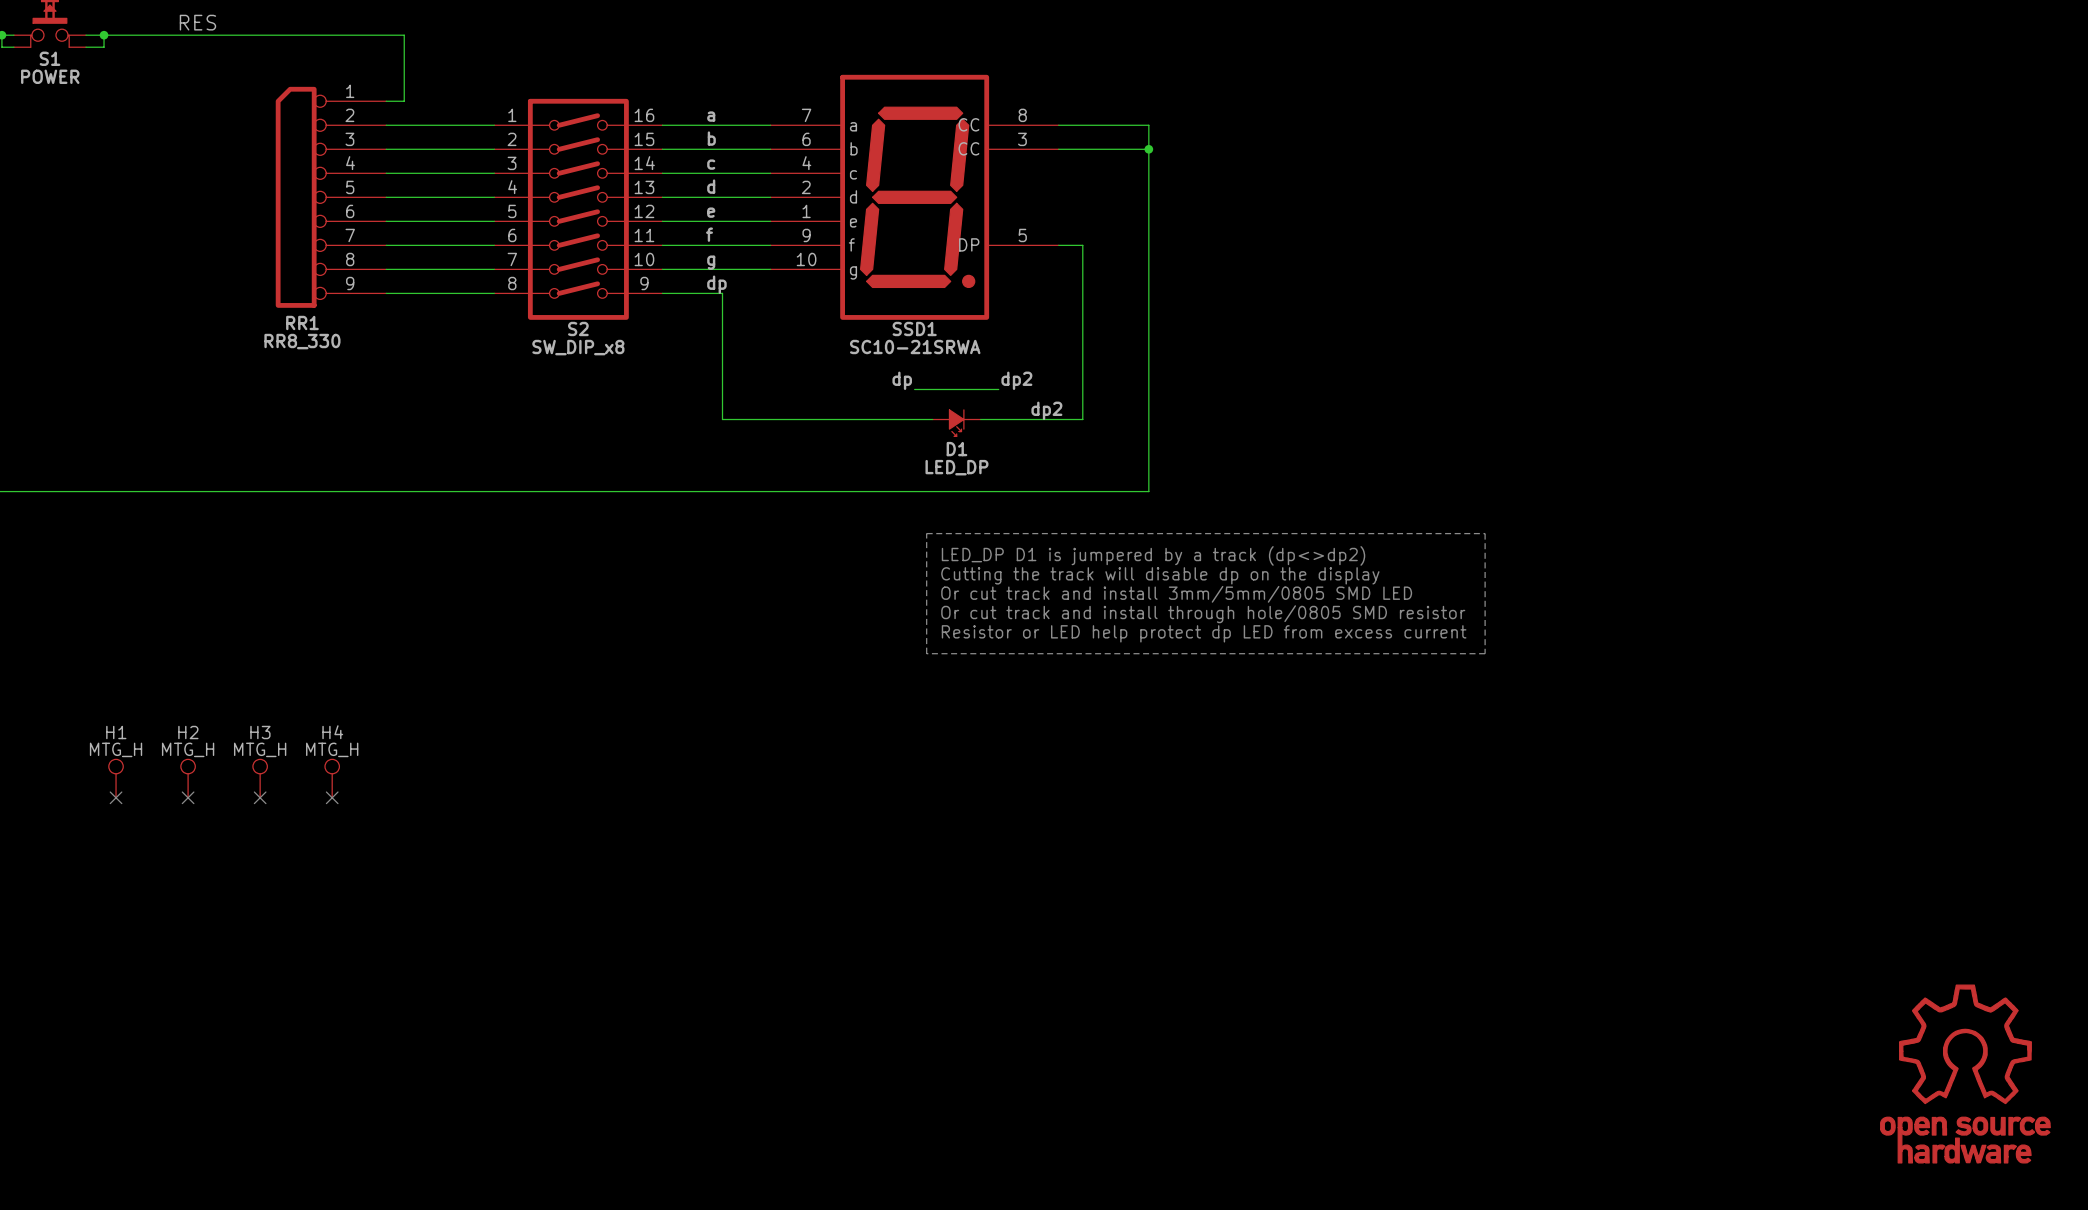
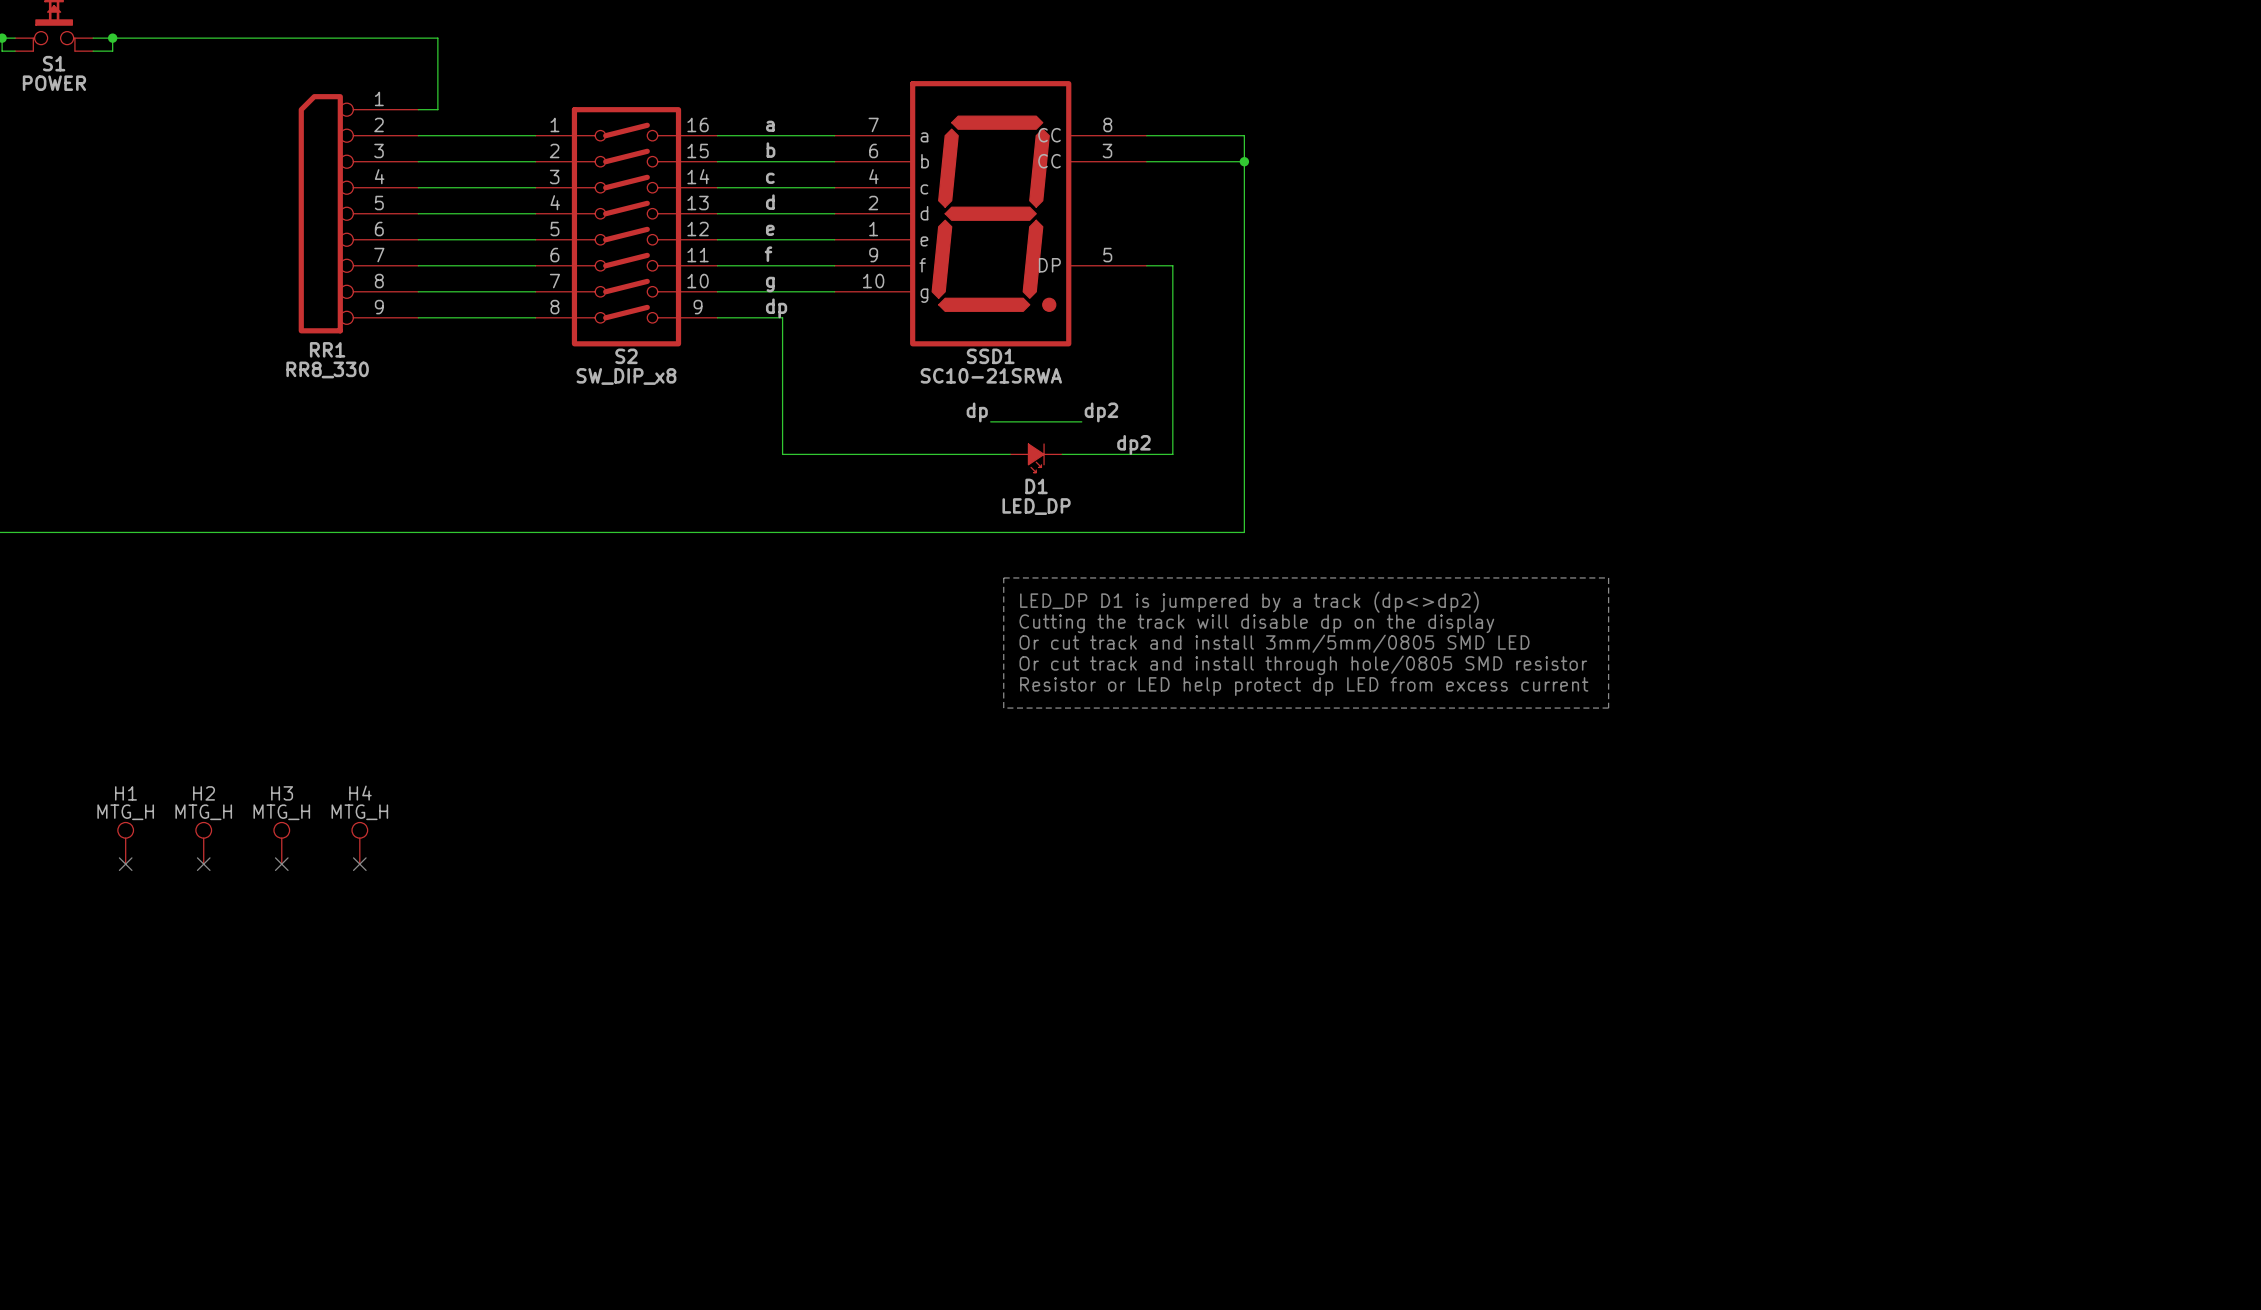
label: RES (197, 22) -> none
part: (1965, 1074) -> none

